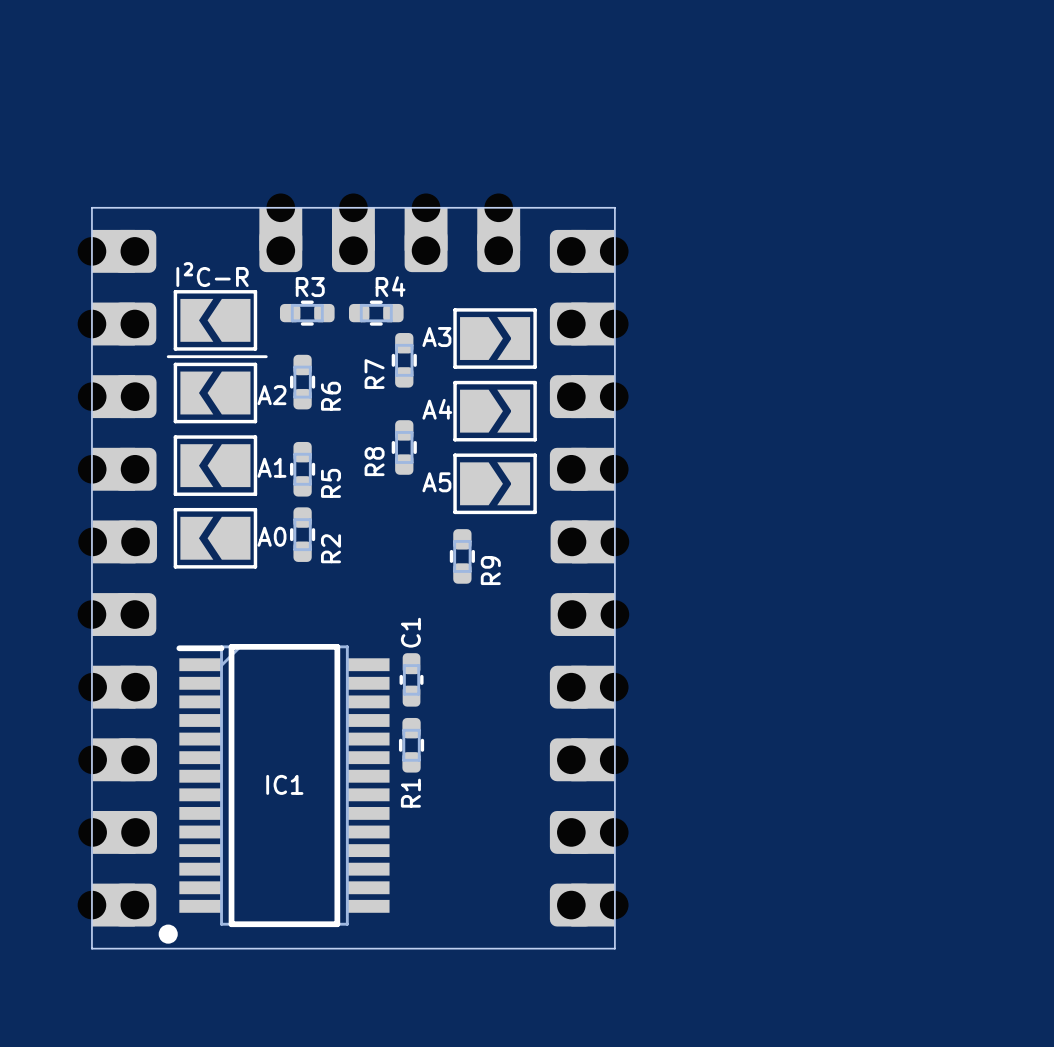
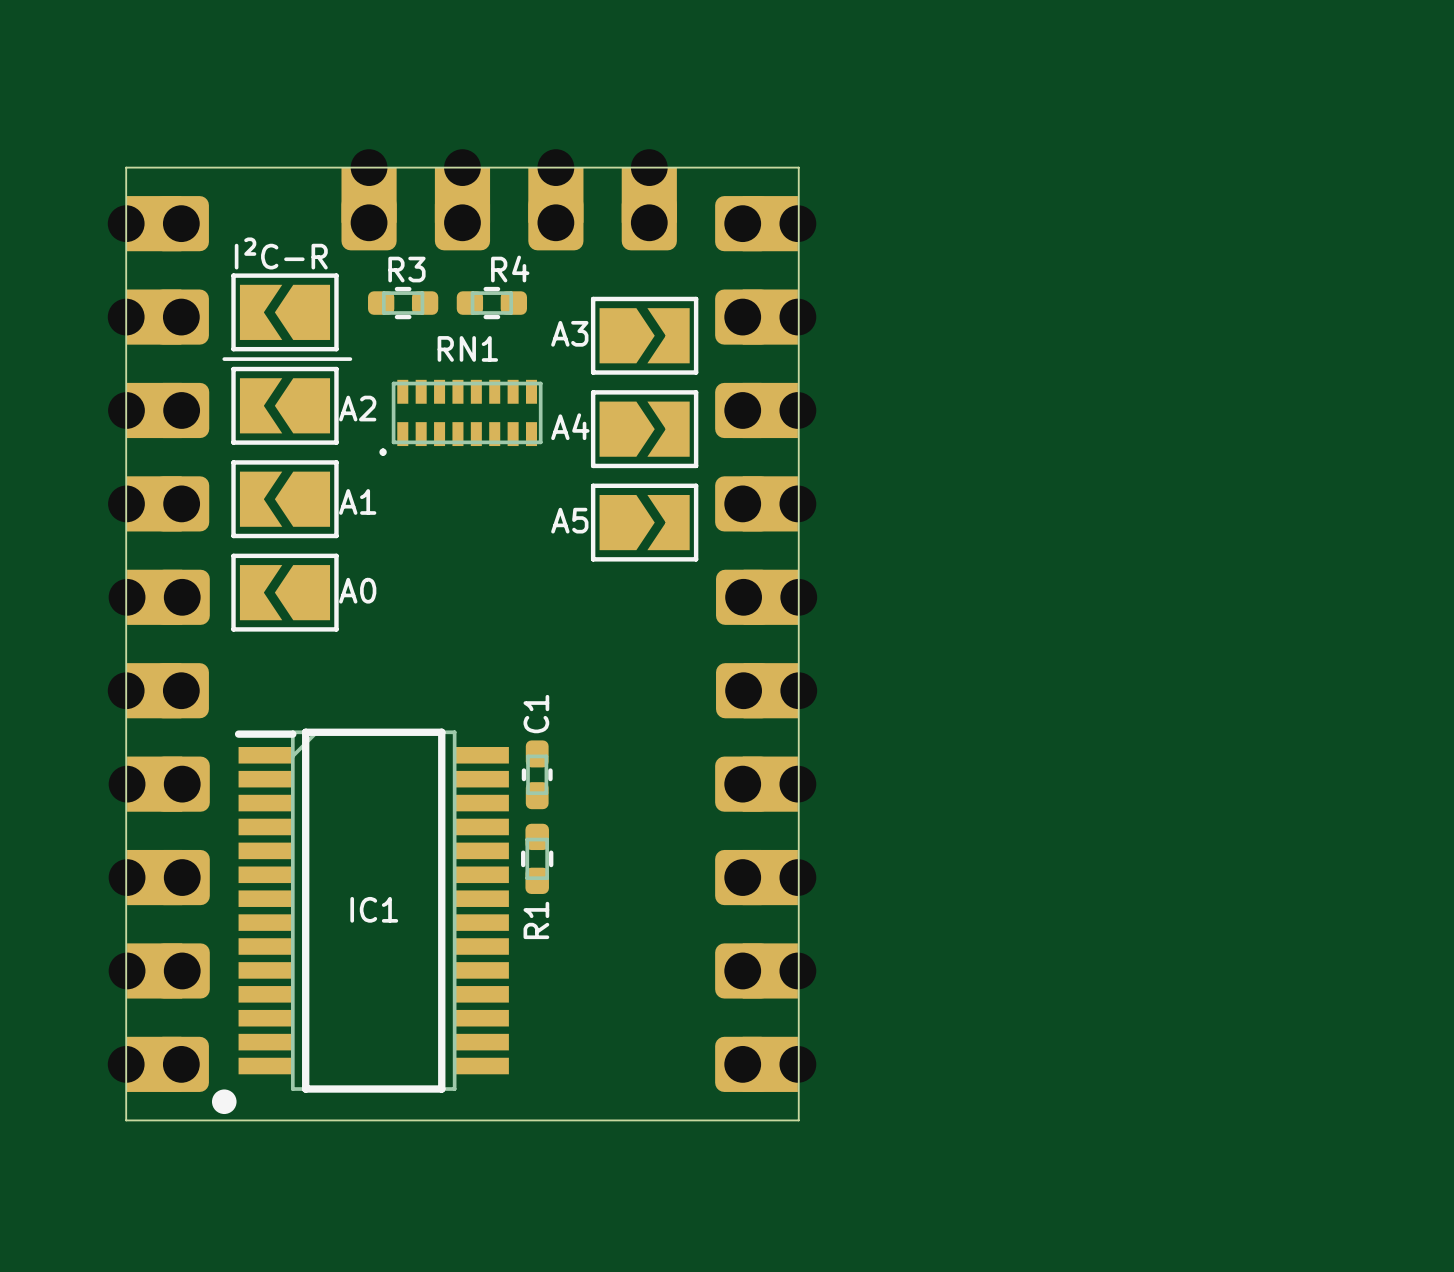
R7: (404, 360) -> none
R6: (302, 382) -> none
RN1: none -> (460, 417)
R8: (404, 447) -> none
R5: (302, 469) -> none
R2: (302, 534) -> none
R9: (462, 556) -> none

